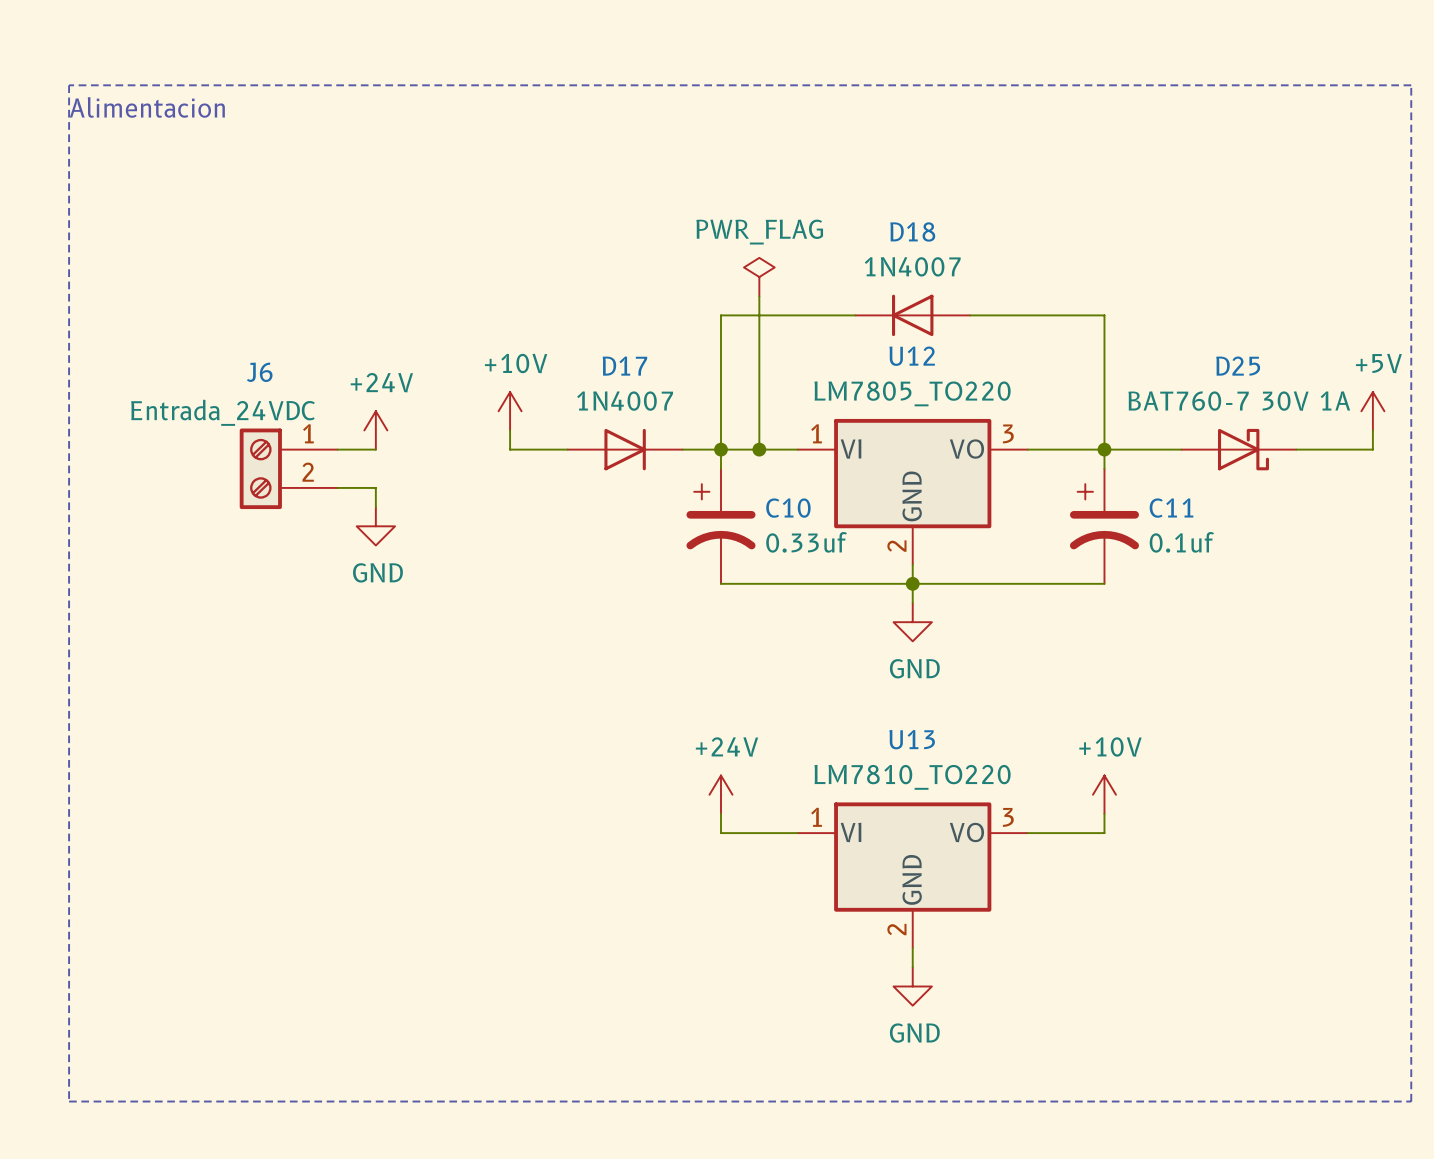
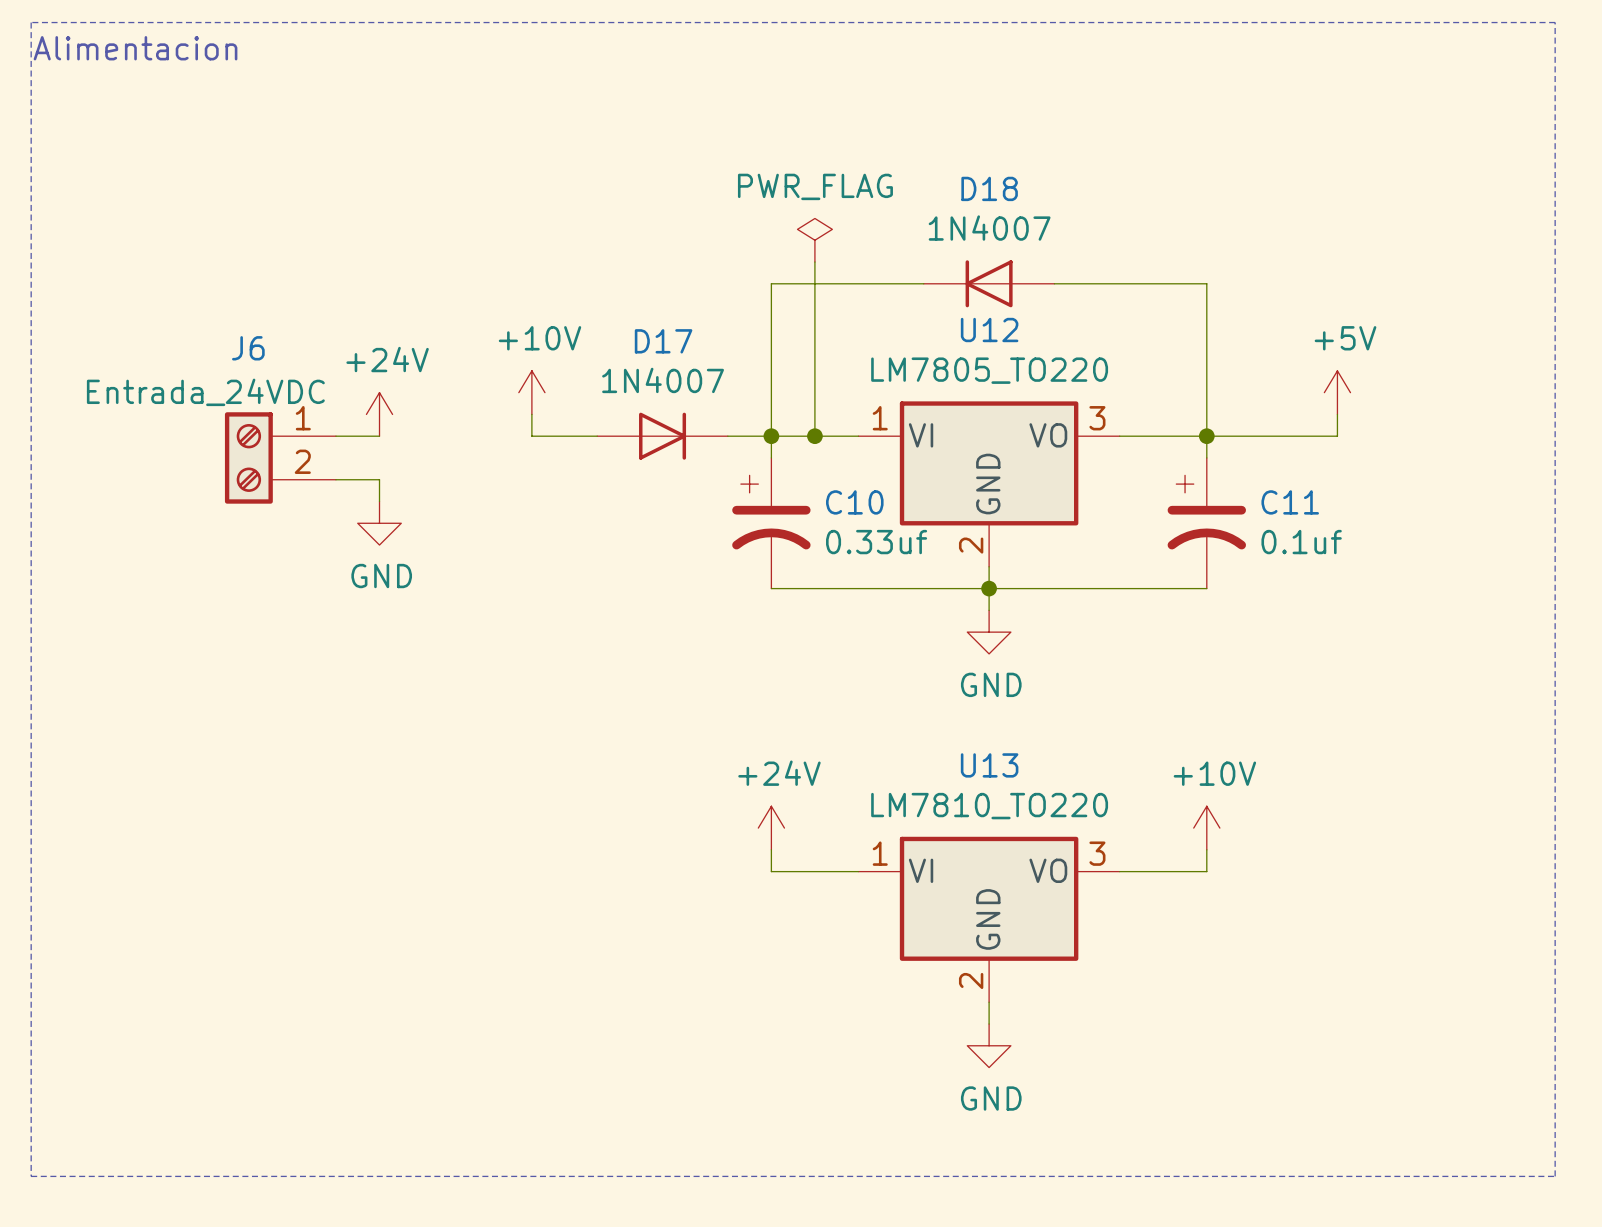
power symbol position: +5V (1372, 411) -> +5V (1337, 392)
wire: (1372, 430) (1372, 449) (1296, 449) -> none
D25: BAT760-7 30V 1A (1238, 449) -> none

